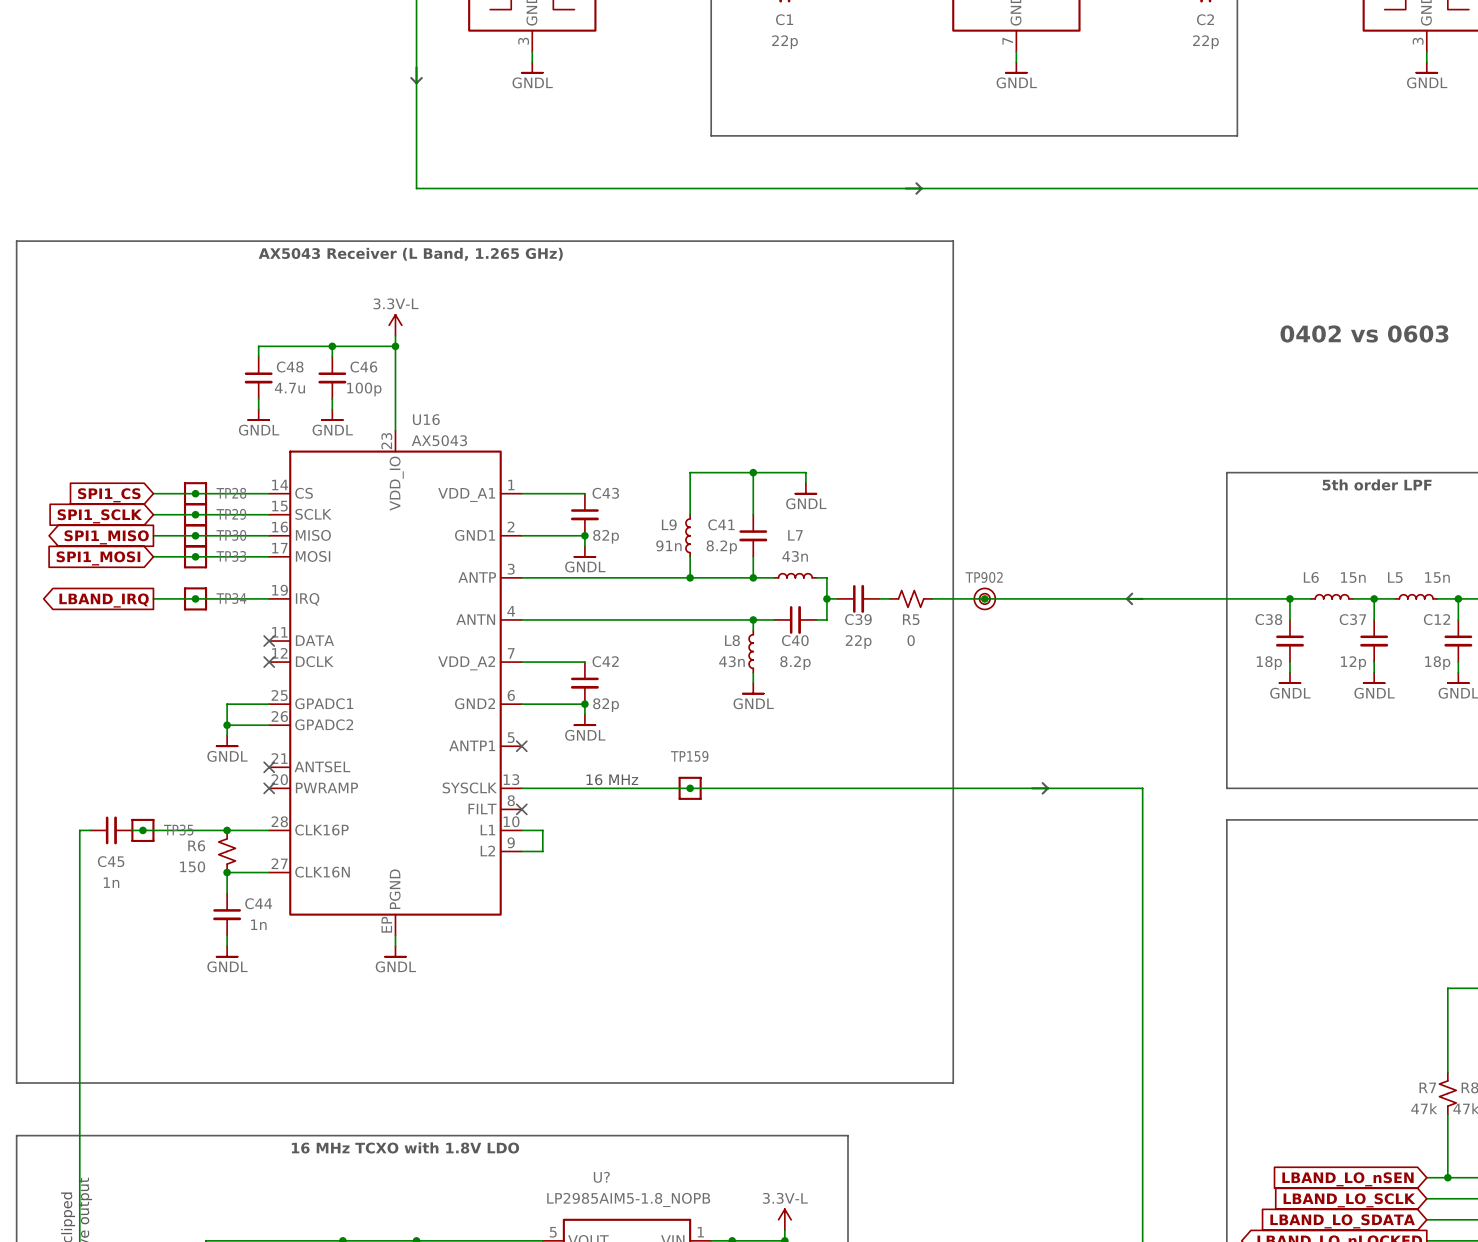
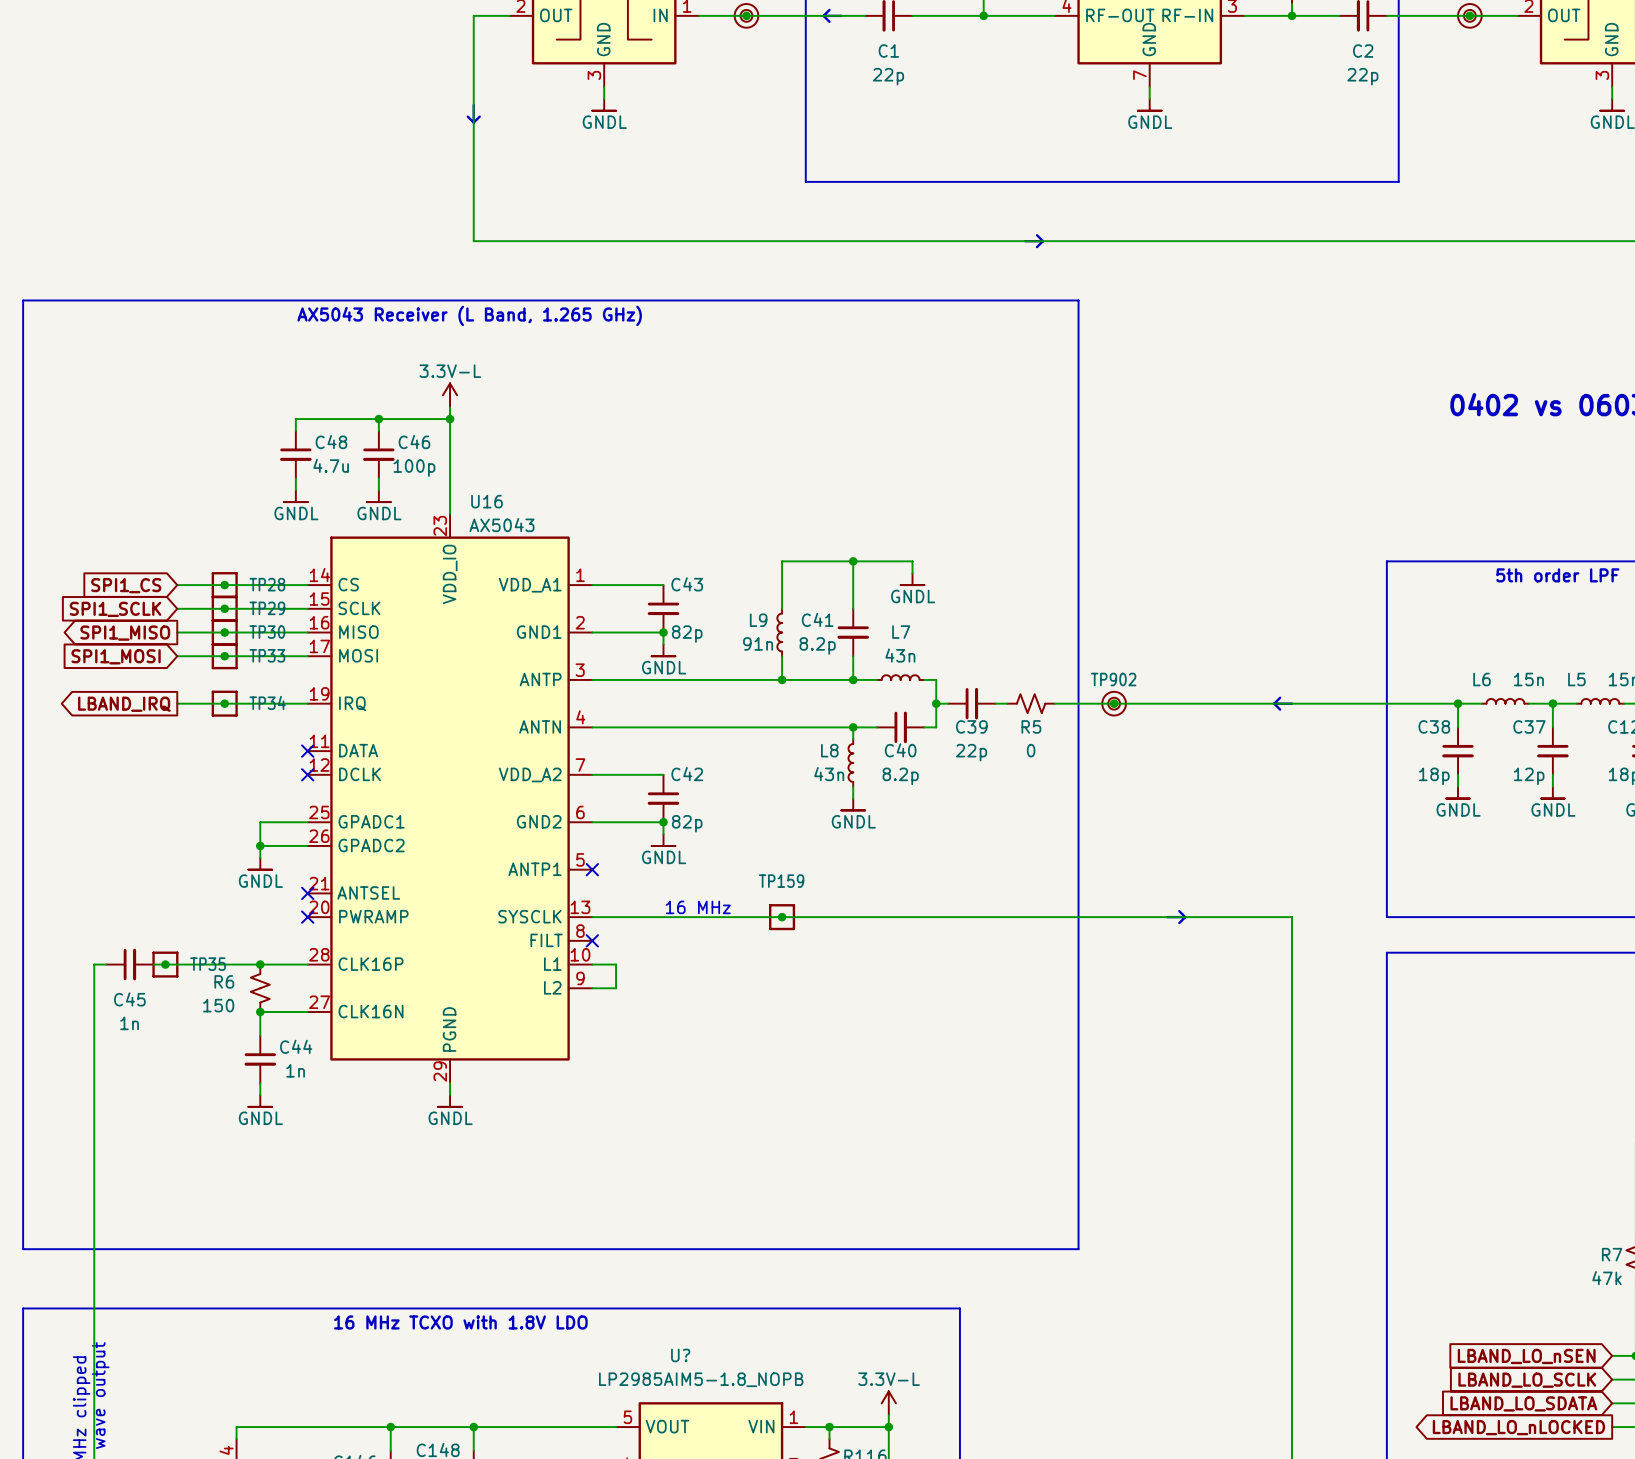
U16 pin number: EP (386, 924) -> 29 (440, 1071)

